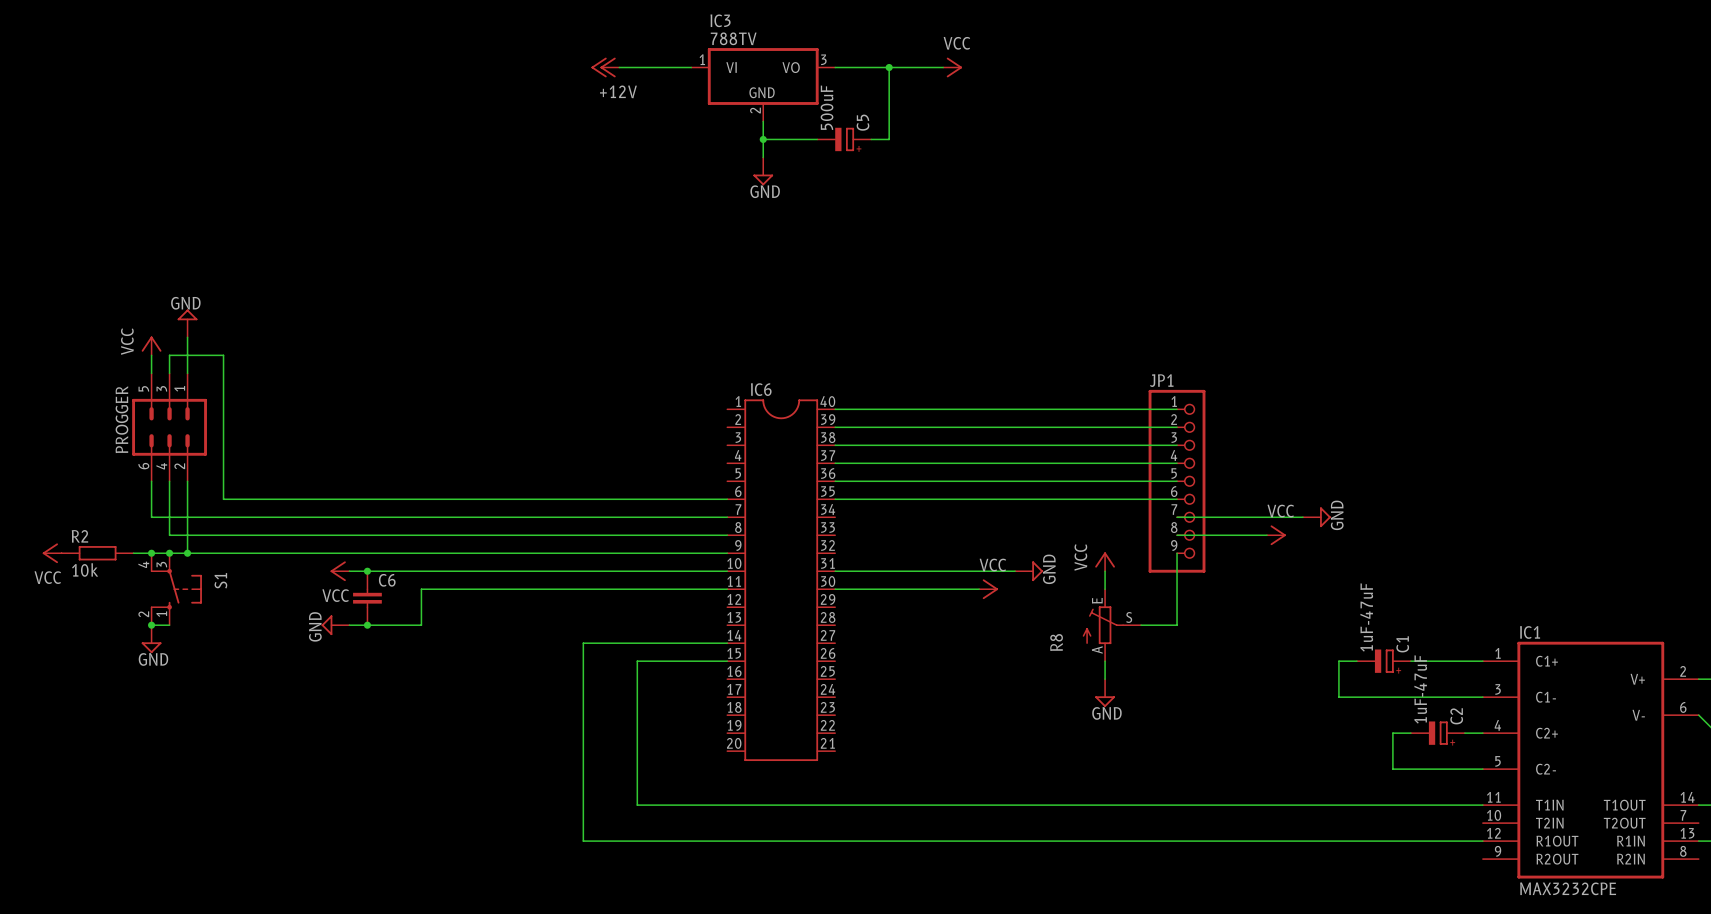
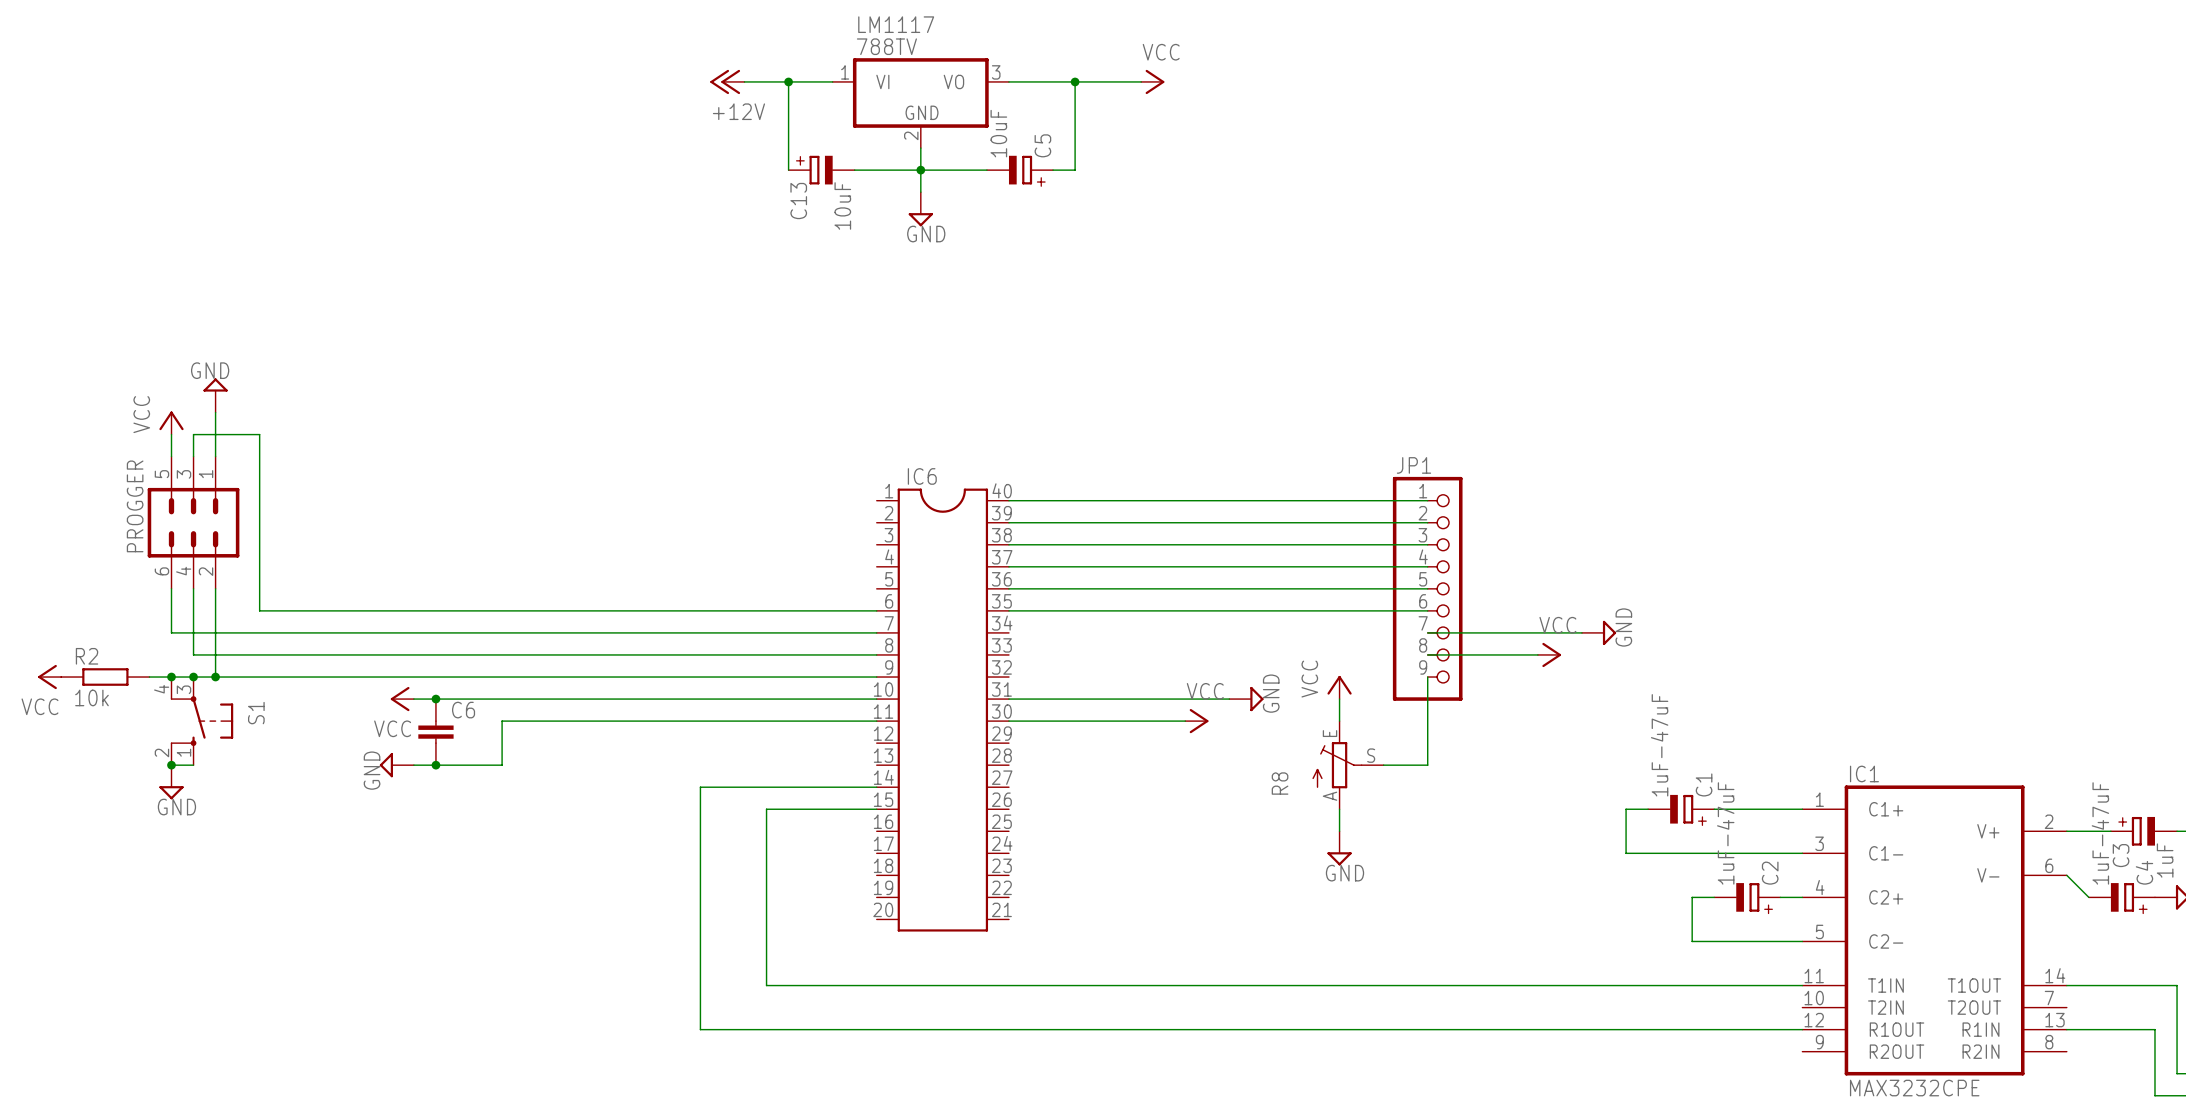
IC3 name: IC3 (720, 20) -> LM1117 (896, 24)
wire: none -> (788, 81) (788, 170)
junction: none -> (788, 81)
C5 value: 500uF (827, 107) -> 10uF (998, 133)
C13: none -> 10uF (821, 170)
wire: none -> (854, 170) (920, 170)

